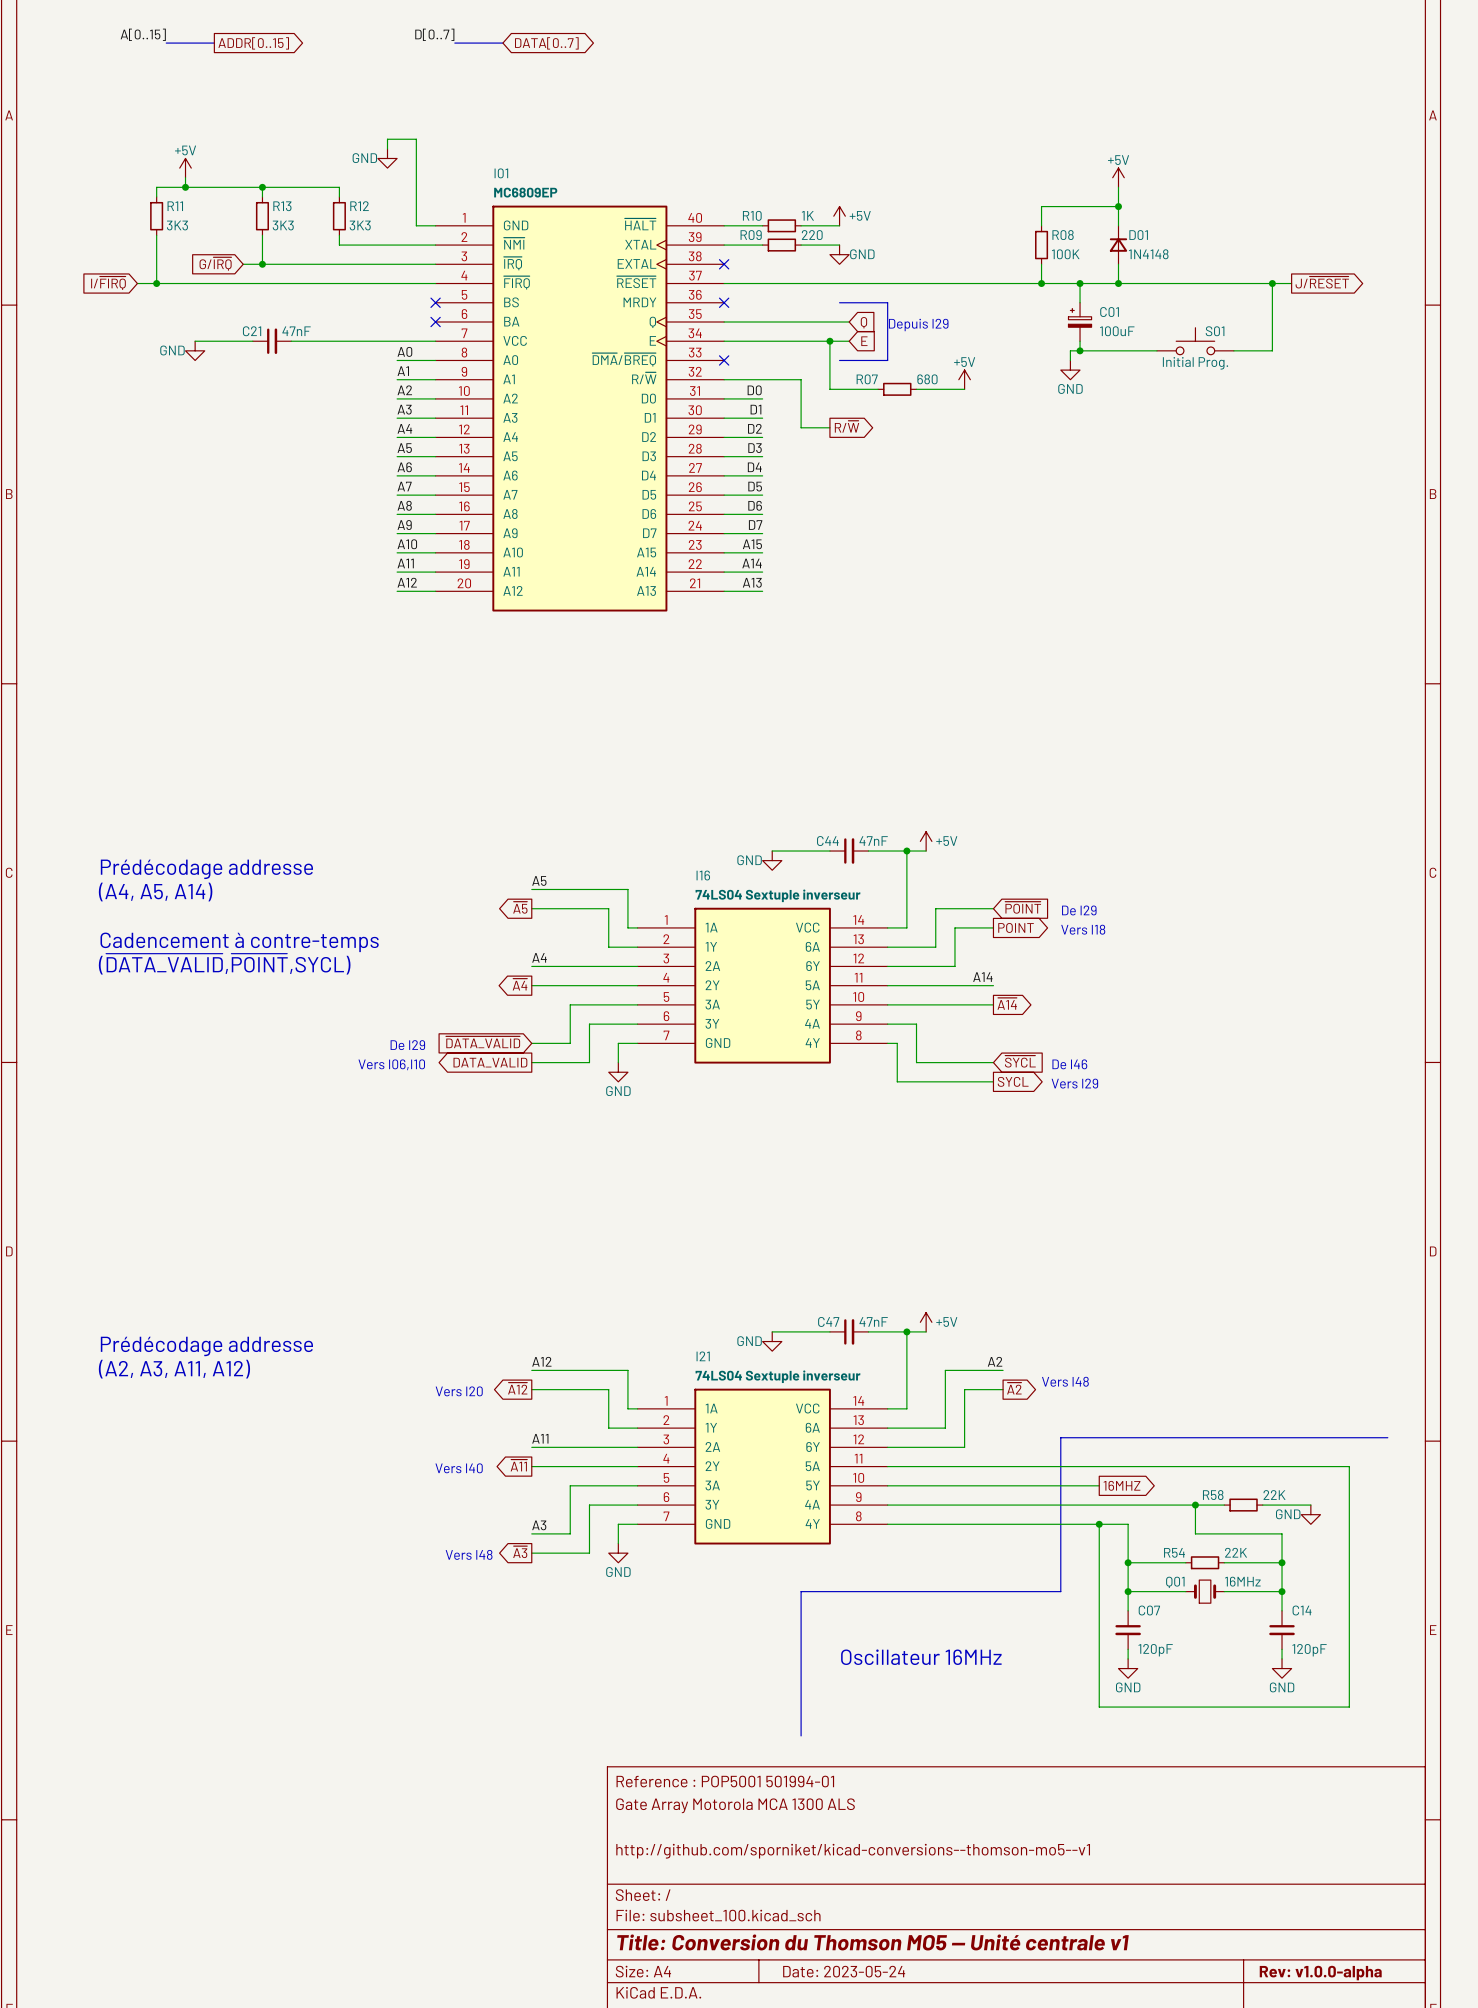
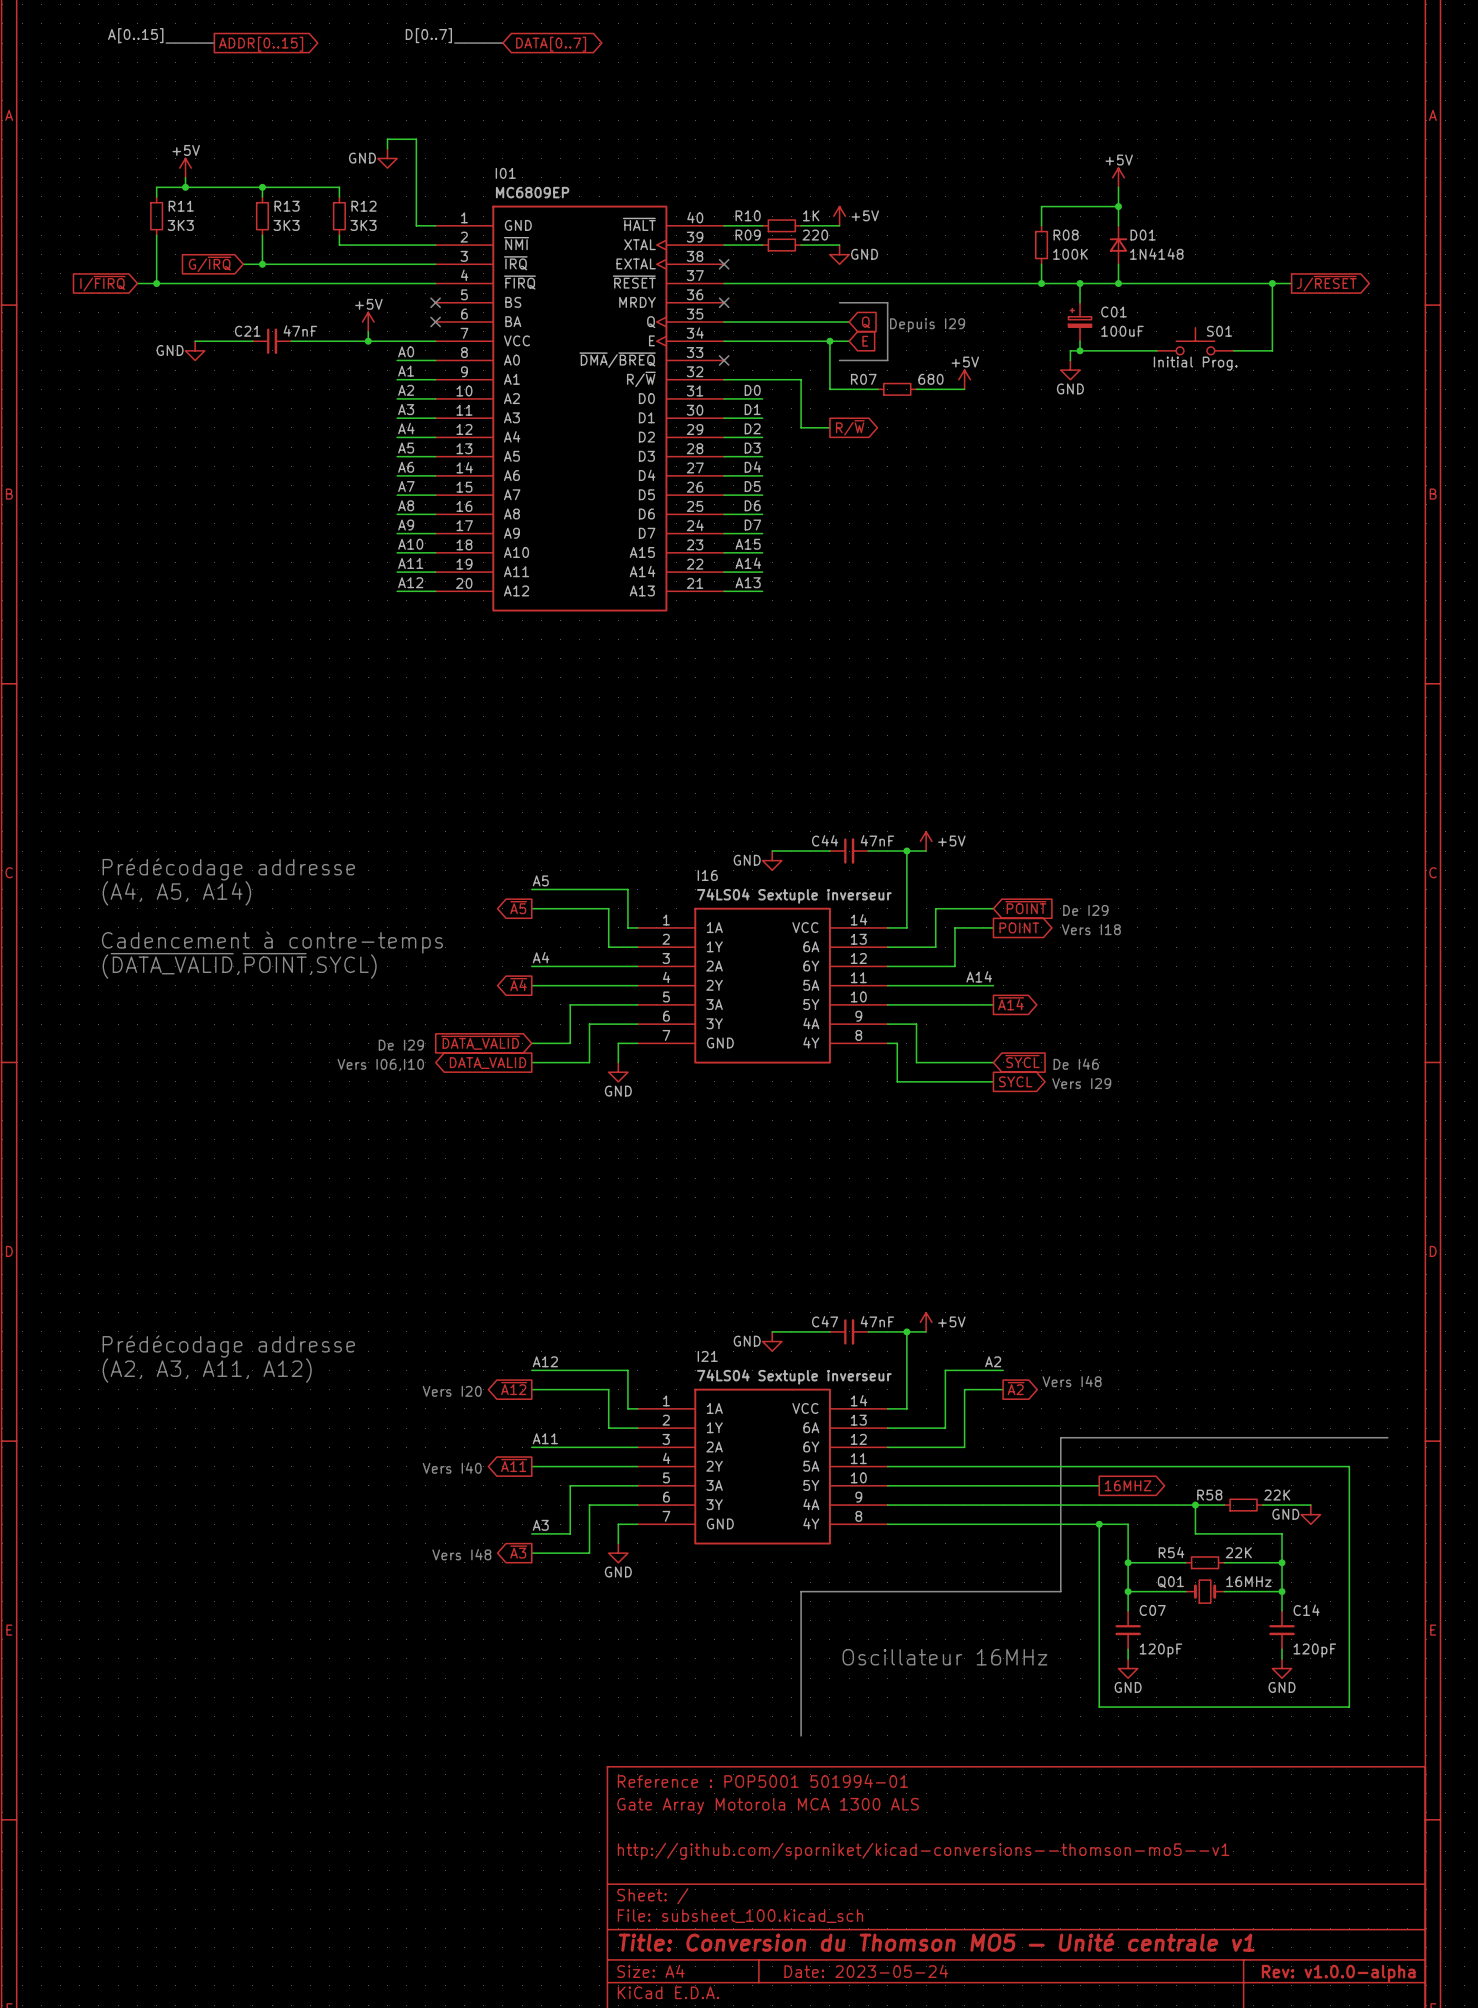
power symbol: none -> +5V (368, 321)
wire: none -> (368, 331) (368, 341)
junction: none -> (368, 341)

